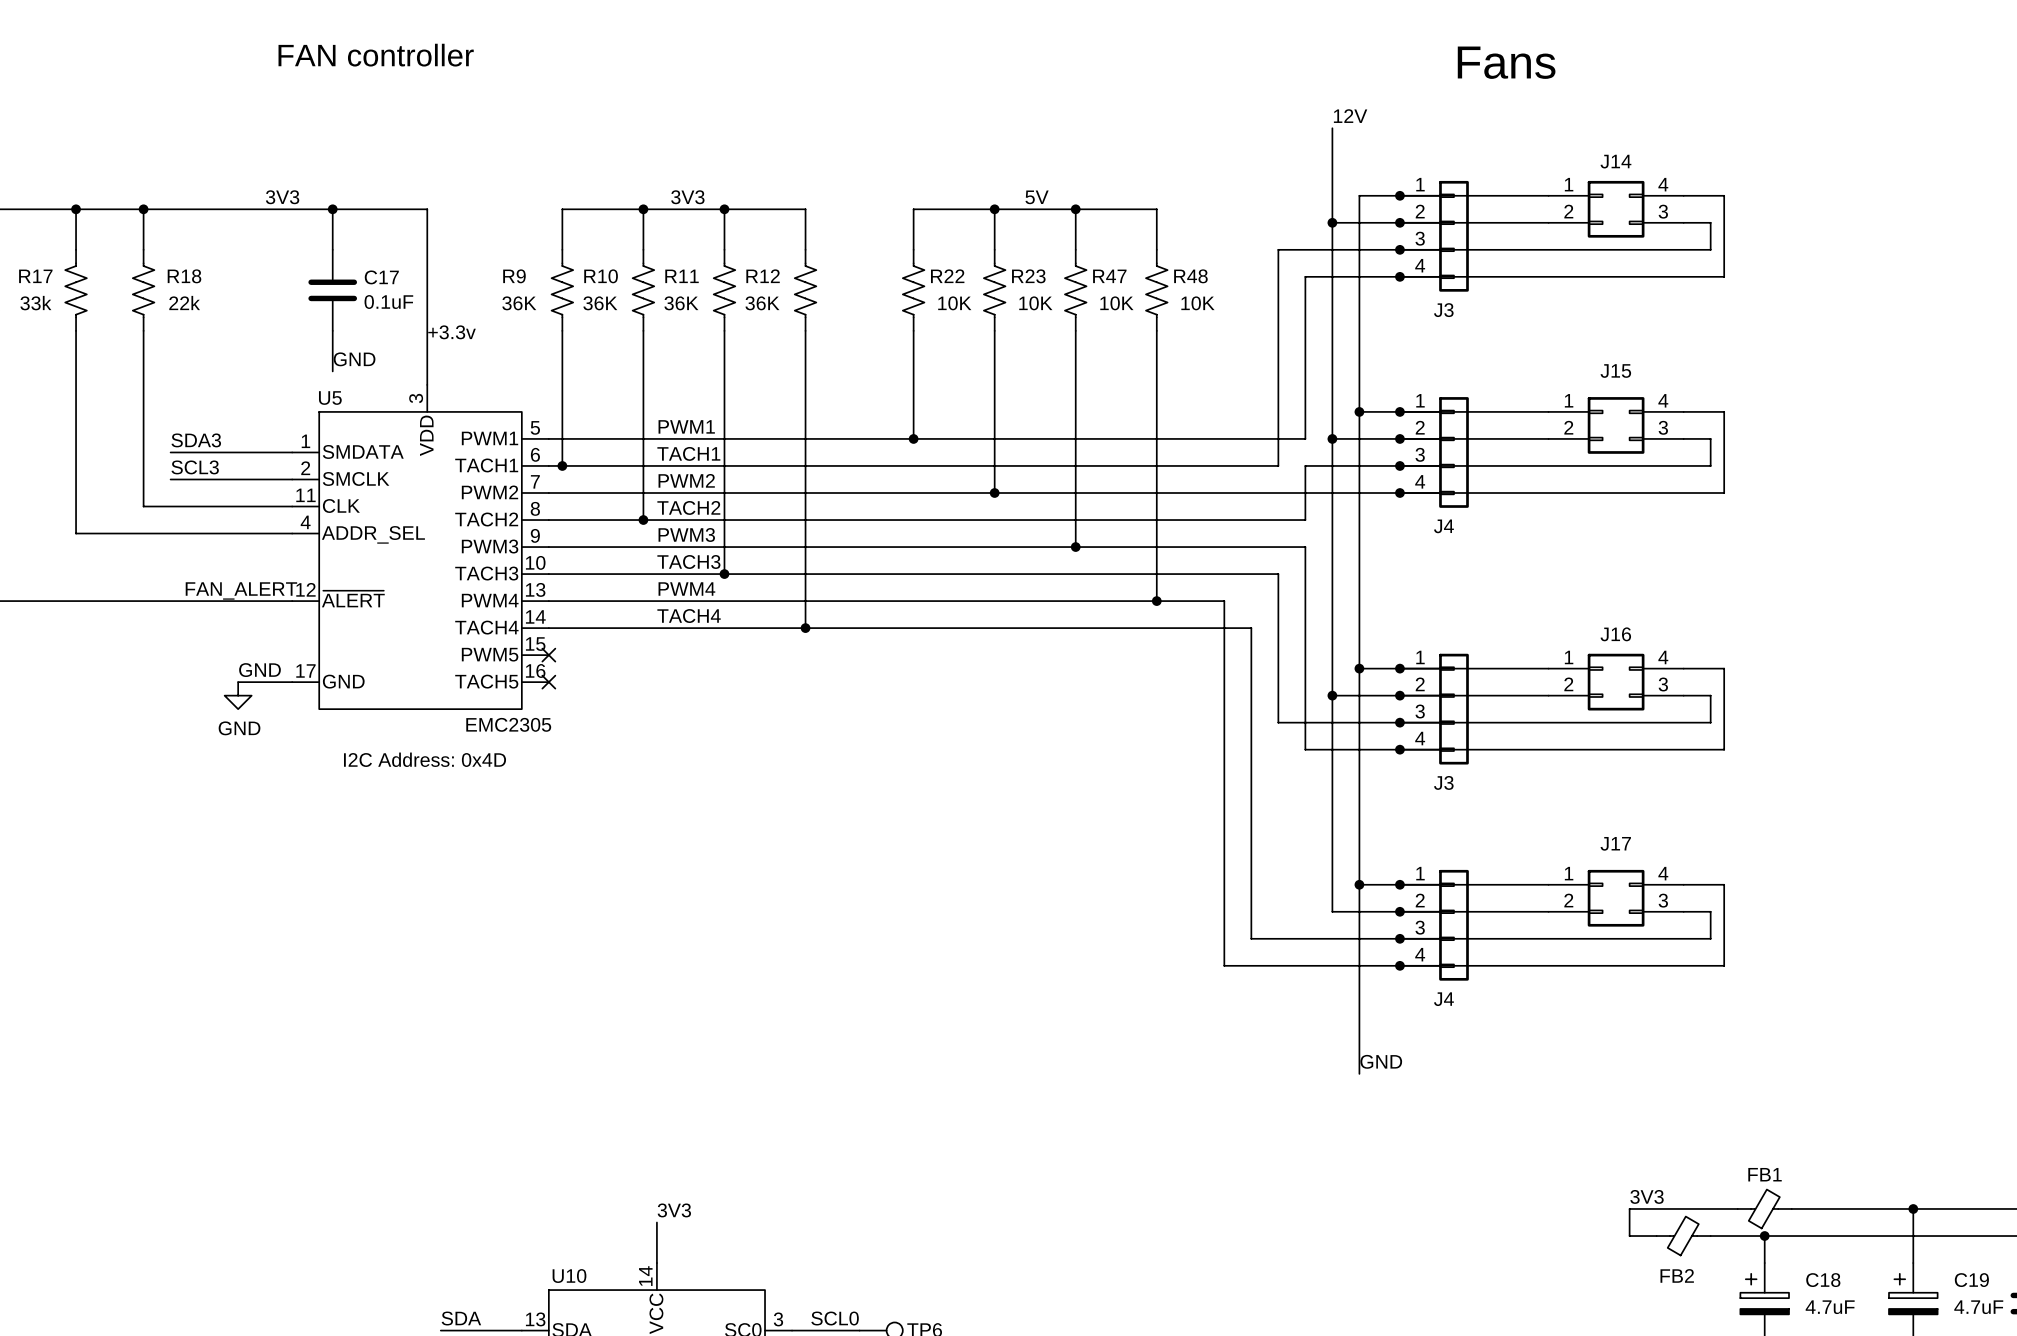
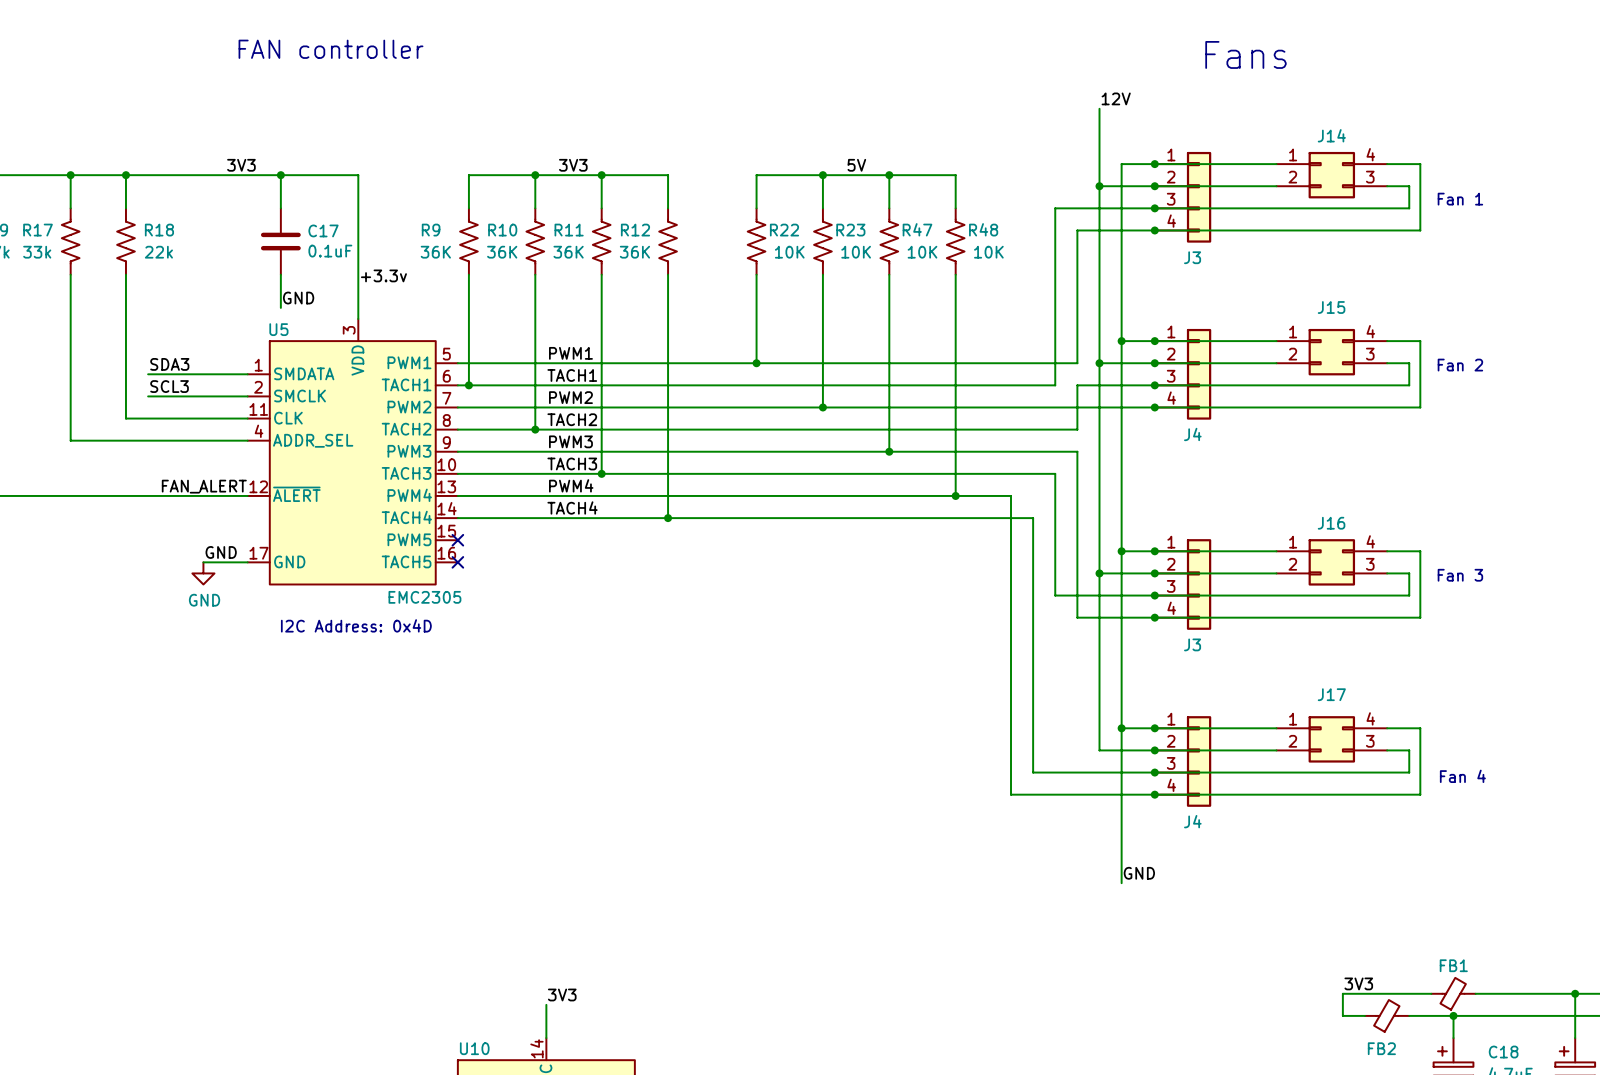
text: none -> Fan 1 (1460, 199)
text: none -> Fan 2 (1460, 365)
text: none -> Fan 3 (1460, 575)
text: none -> Fan 4 (1462, 776)

